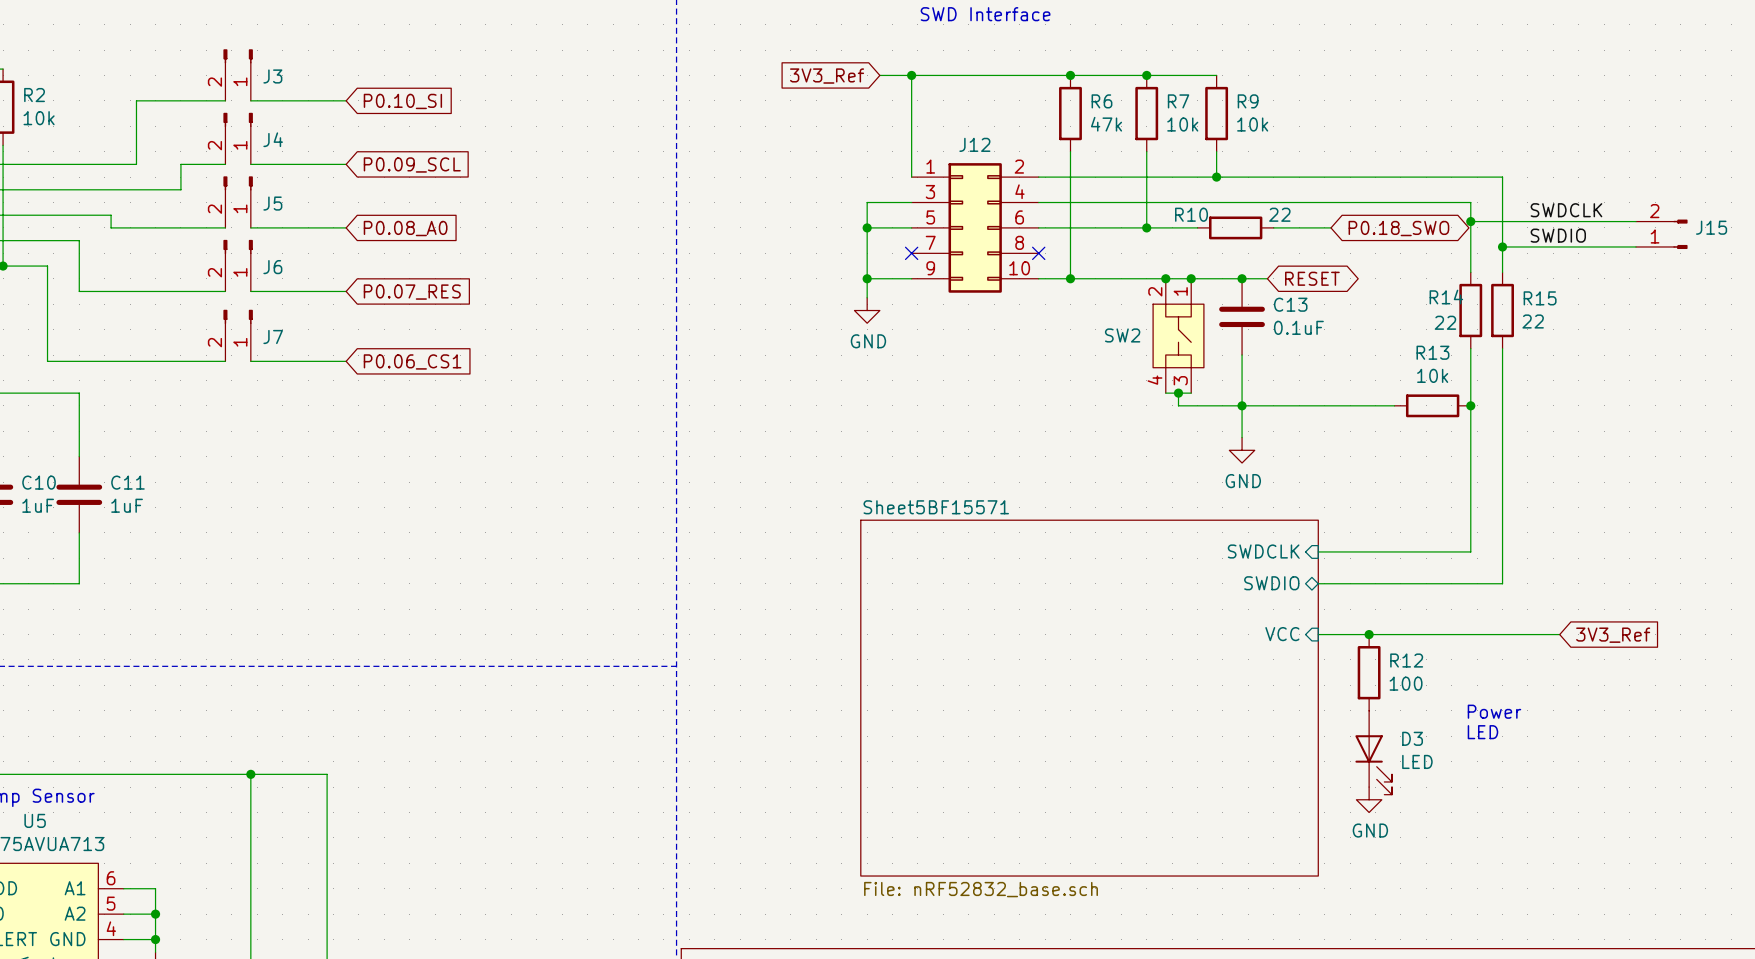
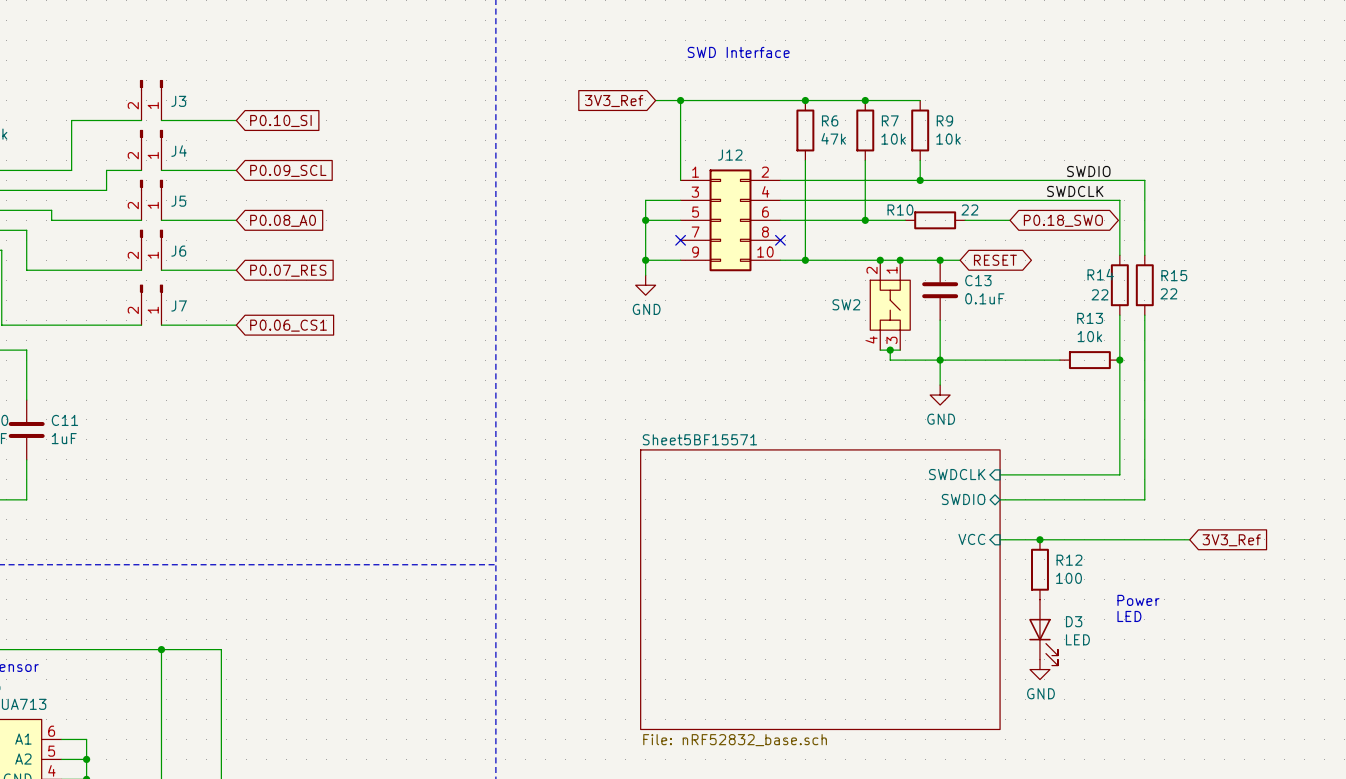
label position: SWDCLK (1566, 210) -> SWDCLK (1075, 191)
wire: (1470, 221) (1635, 221) -> none
junction: (1470, 221) -> none
J15: (1661, 234) -> none
label position: SWDIO (1558, 235) -> SWDIO (1088, 171)
wire: (1502, 246) (1635, 246) -> none
junction: (1502, 246) -> none

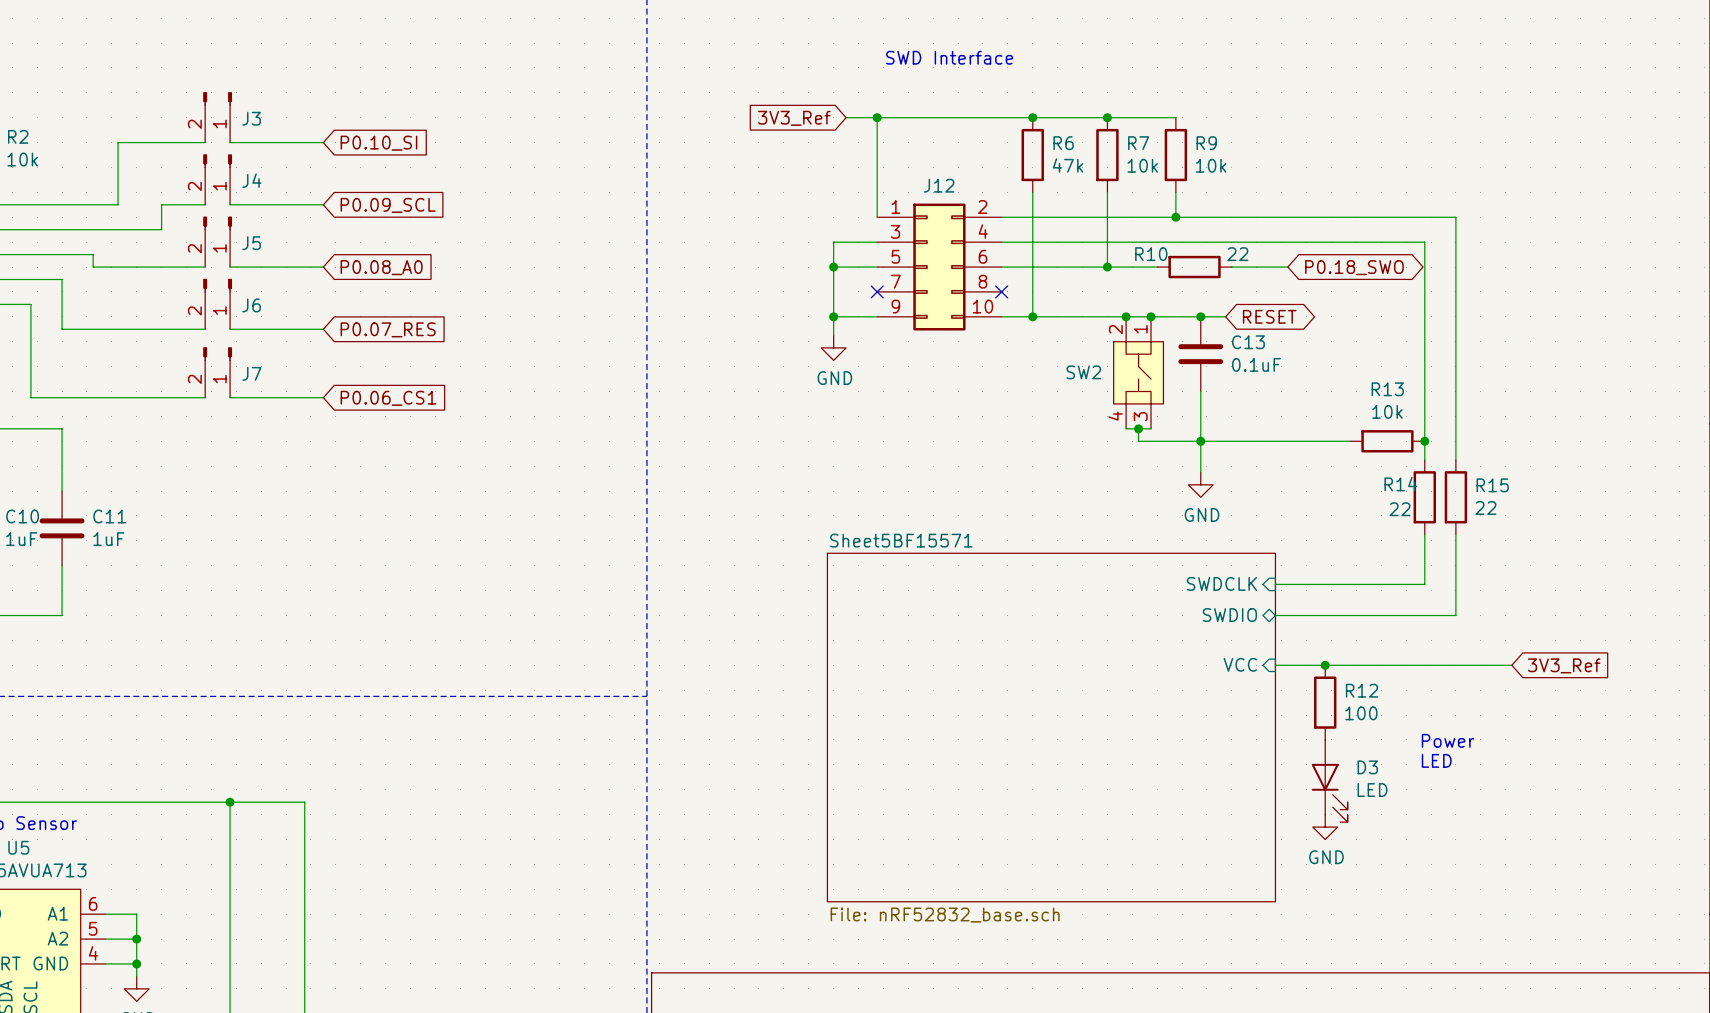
label: SWDIO (1088, 171) -> none
label: SWDCLK (1075, 191) -> none
R14 position: (1119, 285) -> (1424, 497)
R15 position: (1144, 285) -> (1455, 497)
wire: (1119, 375) (1119, 434) -> (1424, 310) (1424, 385)
wire: (1144, 375) (1144, 434) -> (1455, 310) (1455, 385)

